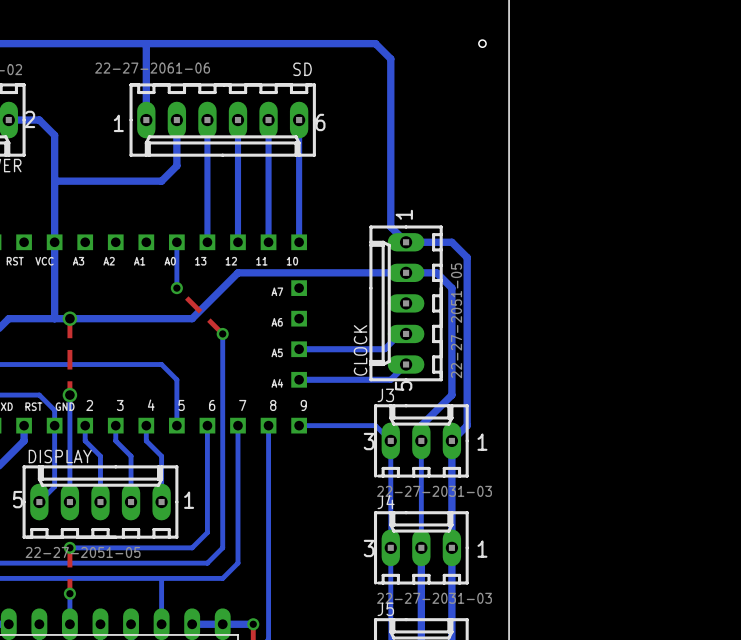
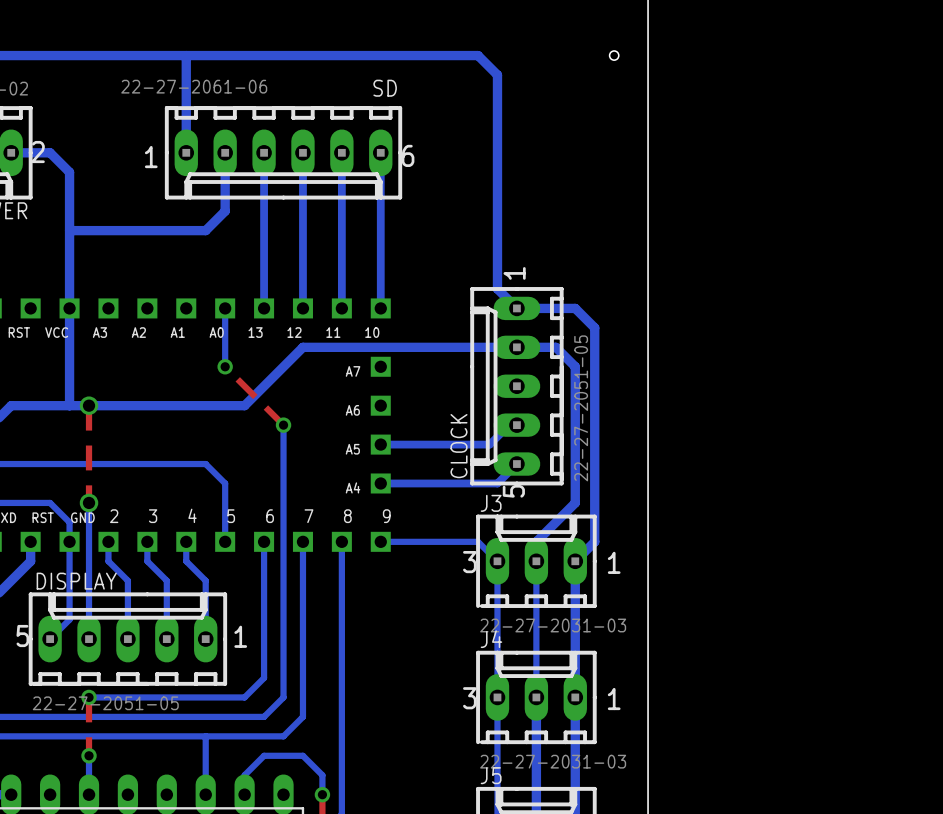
bottom track: (192, 624) (253, 624) -> (244, 794) (244, 775) (264, 755) (302, 755) (322, 775) (322, 794)

